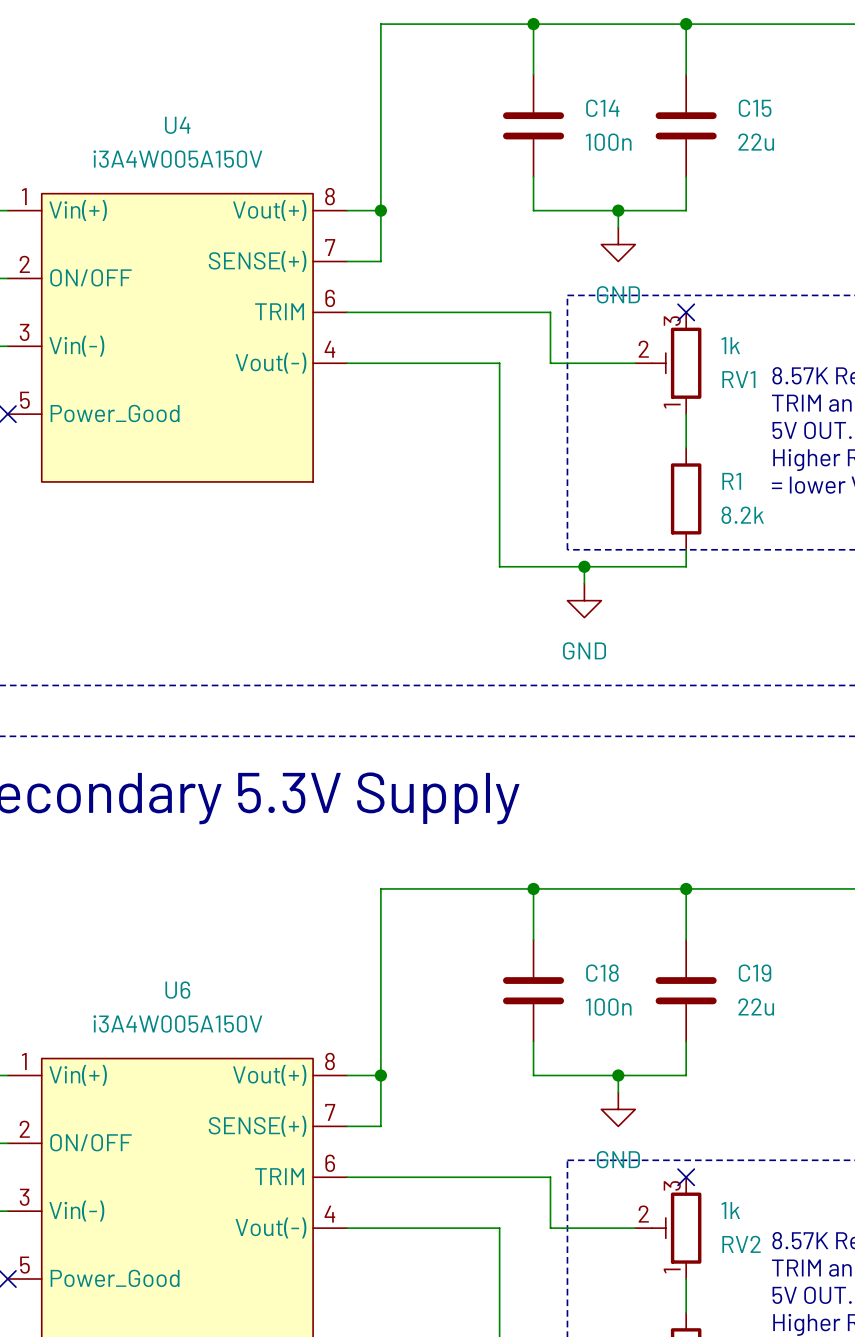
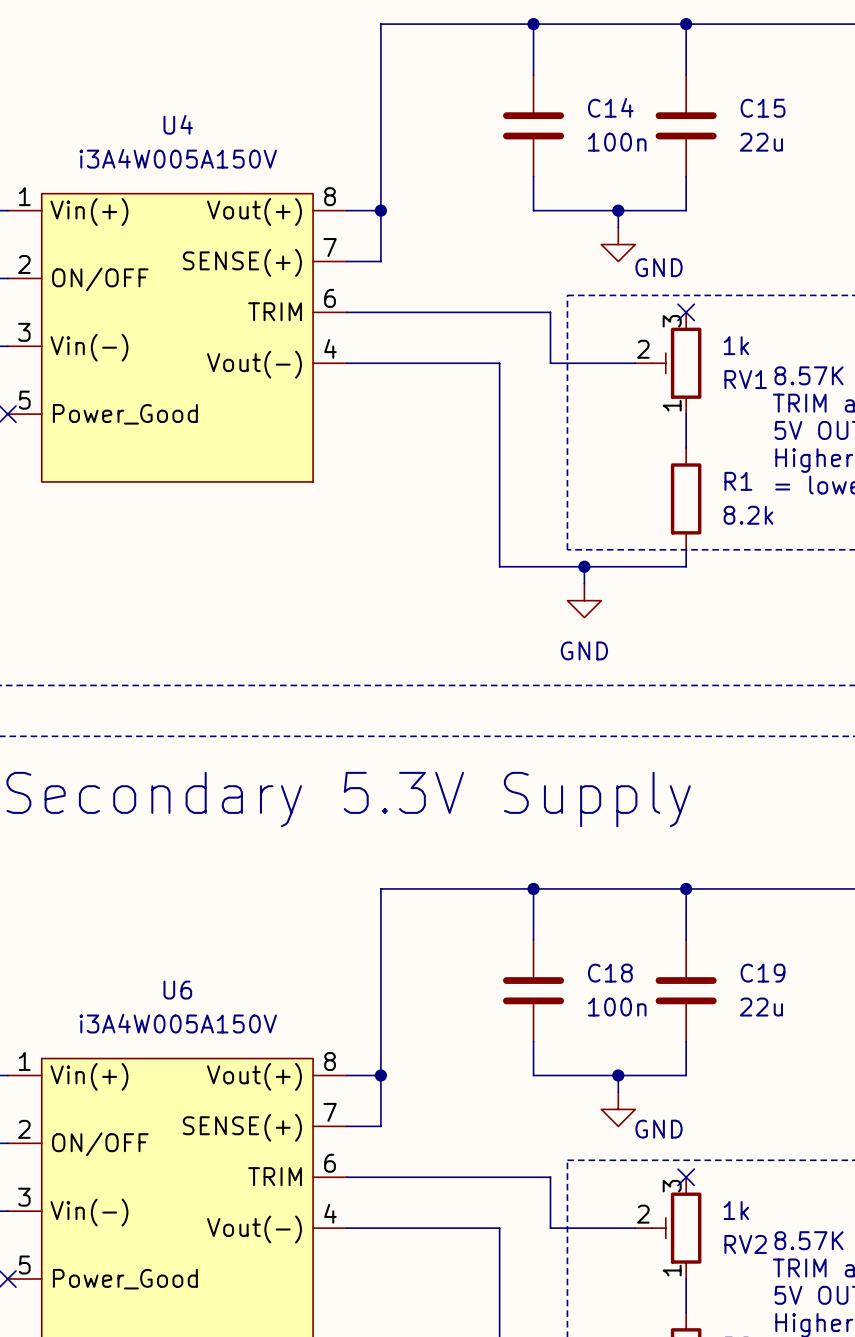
power symbol text position: GND (618, 294) -> GND (659, 267)
power symbol text position: GND (618, 1159) -> GND (659, 1129)

